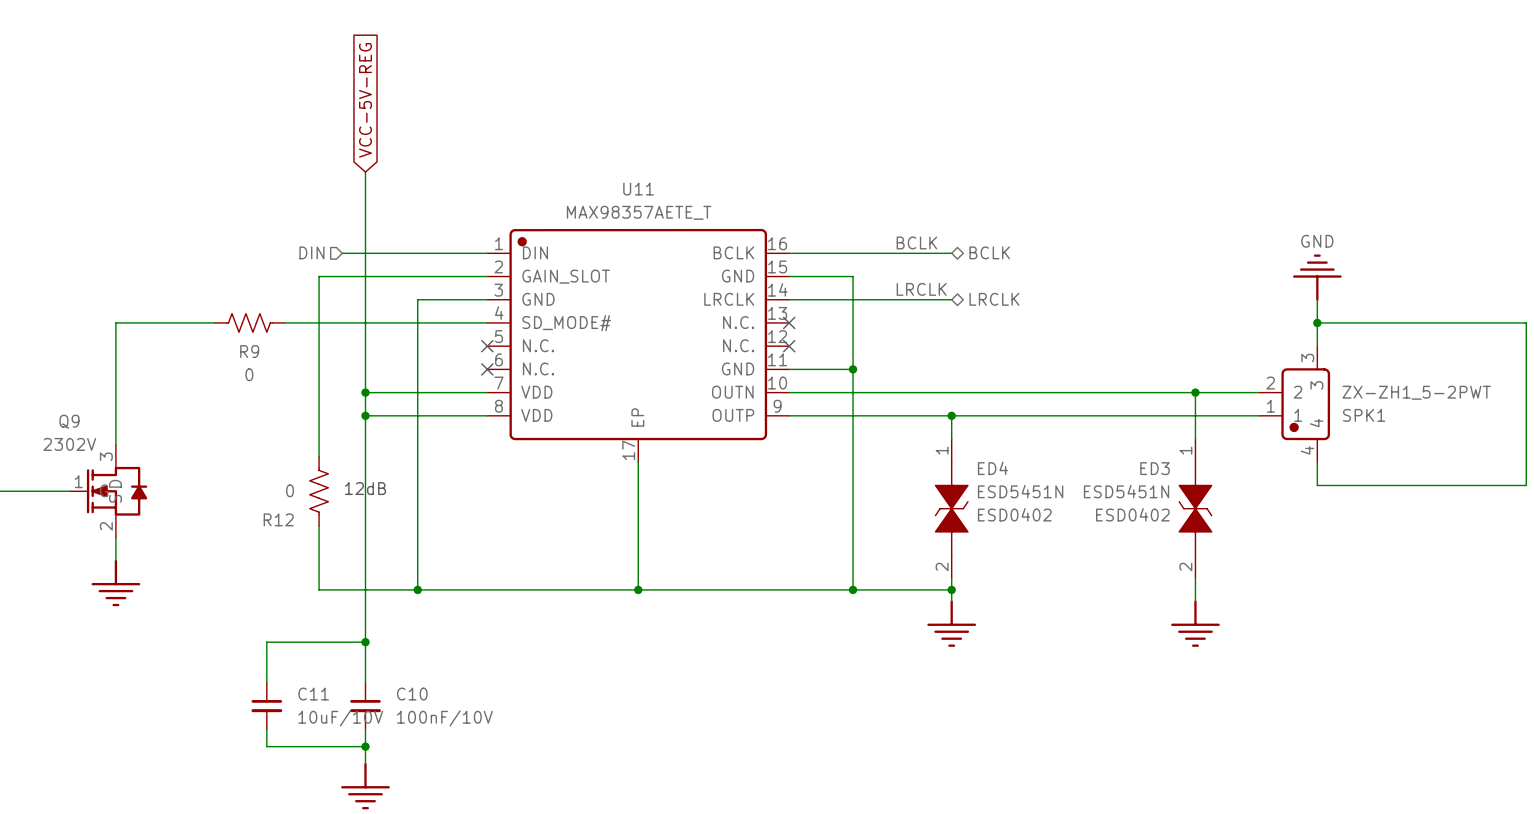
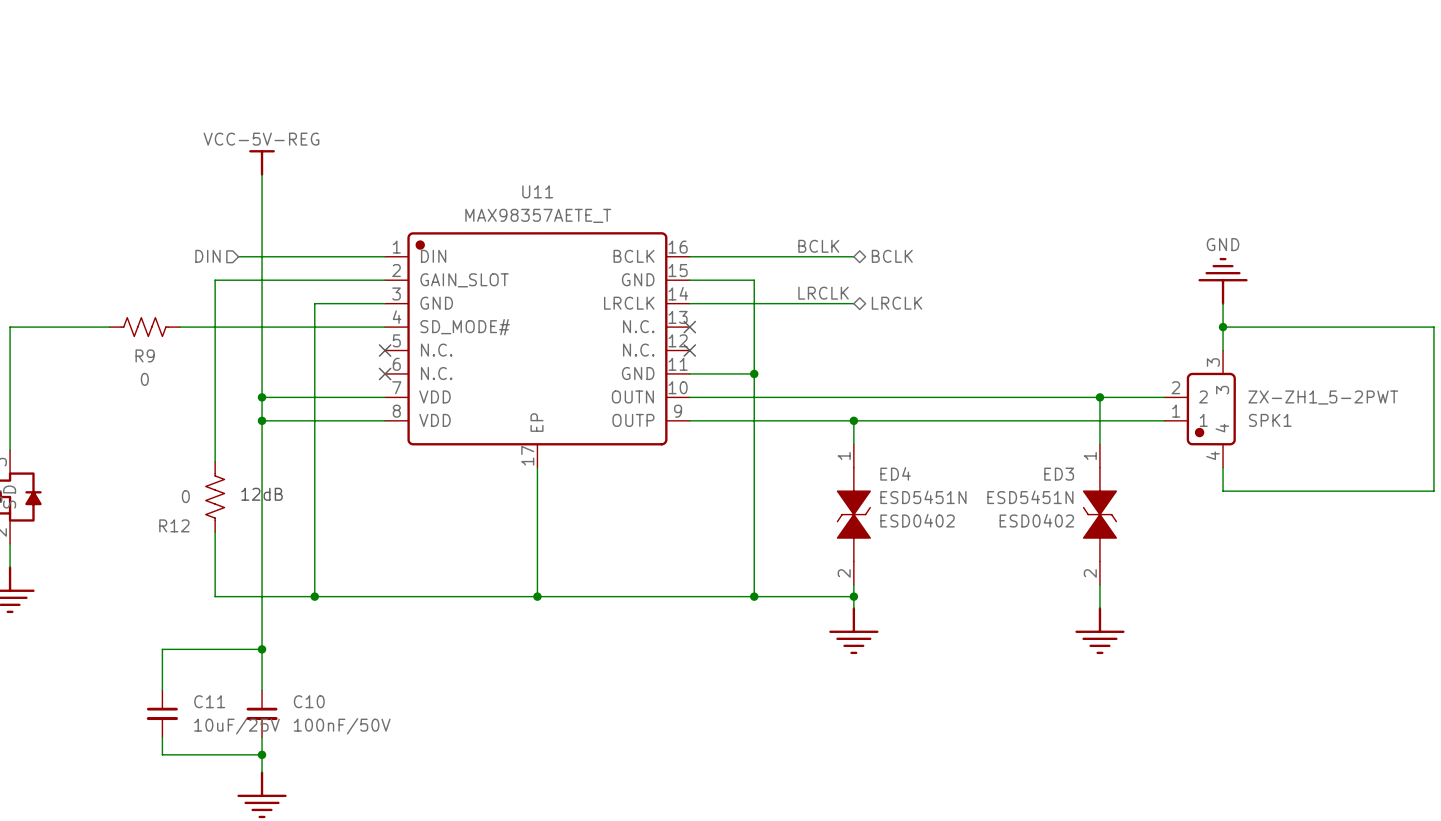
global label: VCC-5V-REG (365, 100) -> none
power symbol: none -> VCC-5V-REG (262, 163)
C11 value: 10uF/10V (340, 718) -> 10uF/25V (236, 726)
C10 value: 100nF/10V (444, 718) -> 100nF/50V (342, 726)

